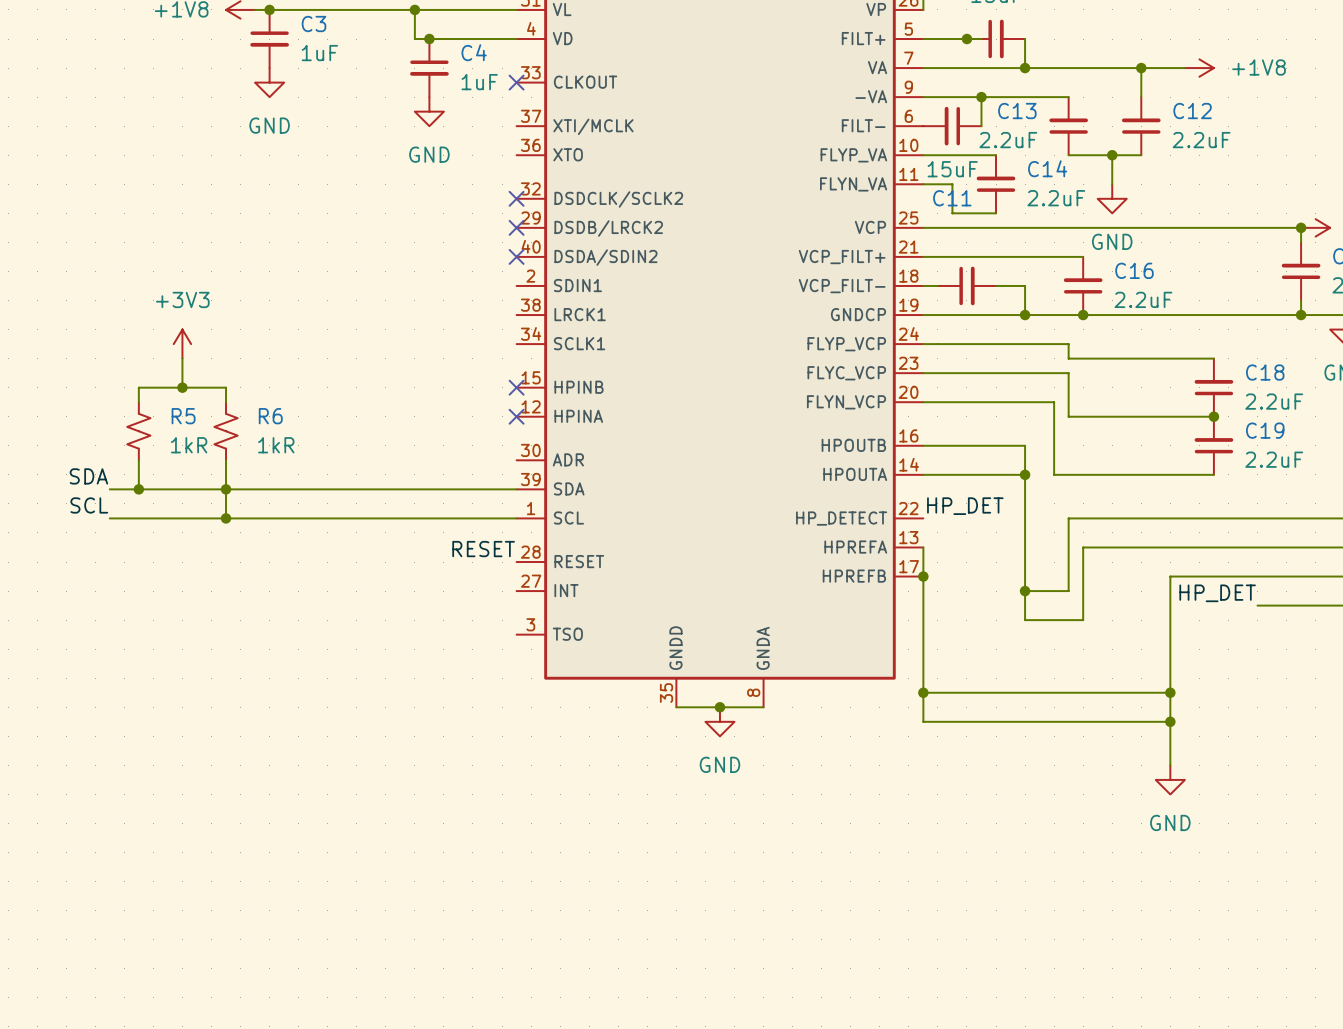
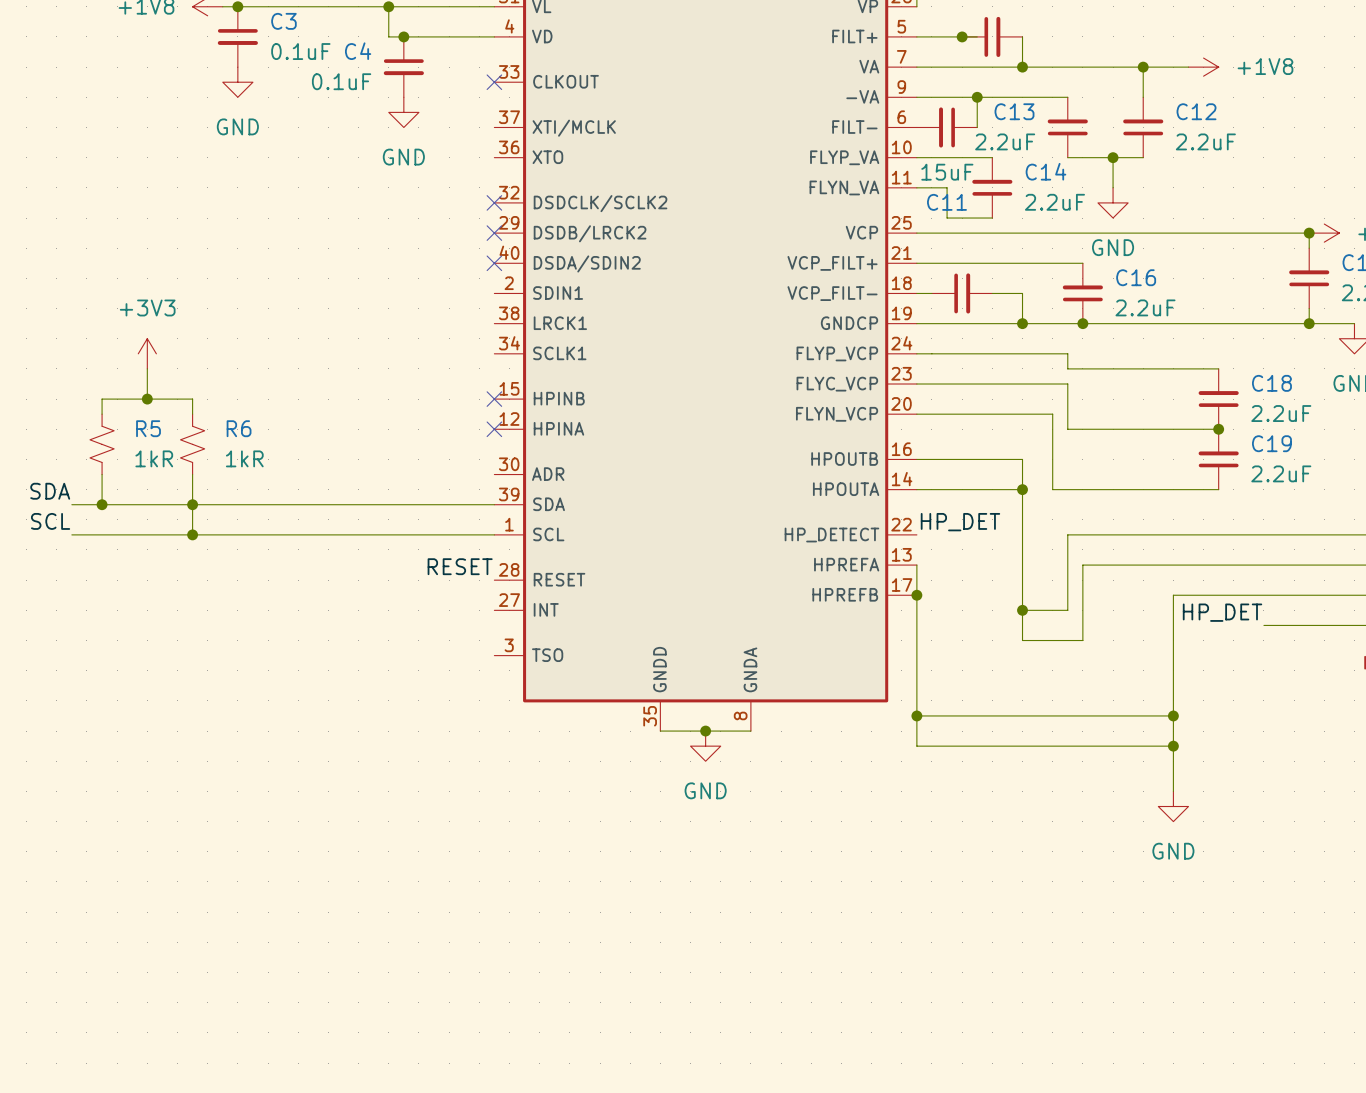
C4 name position: C4 (474, 52) -> C4 (358, 51)
C3 value: 1uF (319, 53) -> 0.1uF (300, 51)
C4 value: 1uF (479, 82) -> 0.1uF (341, 81)

